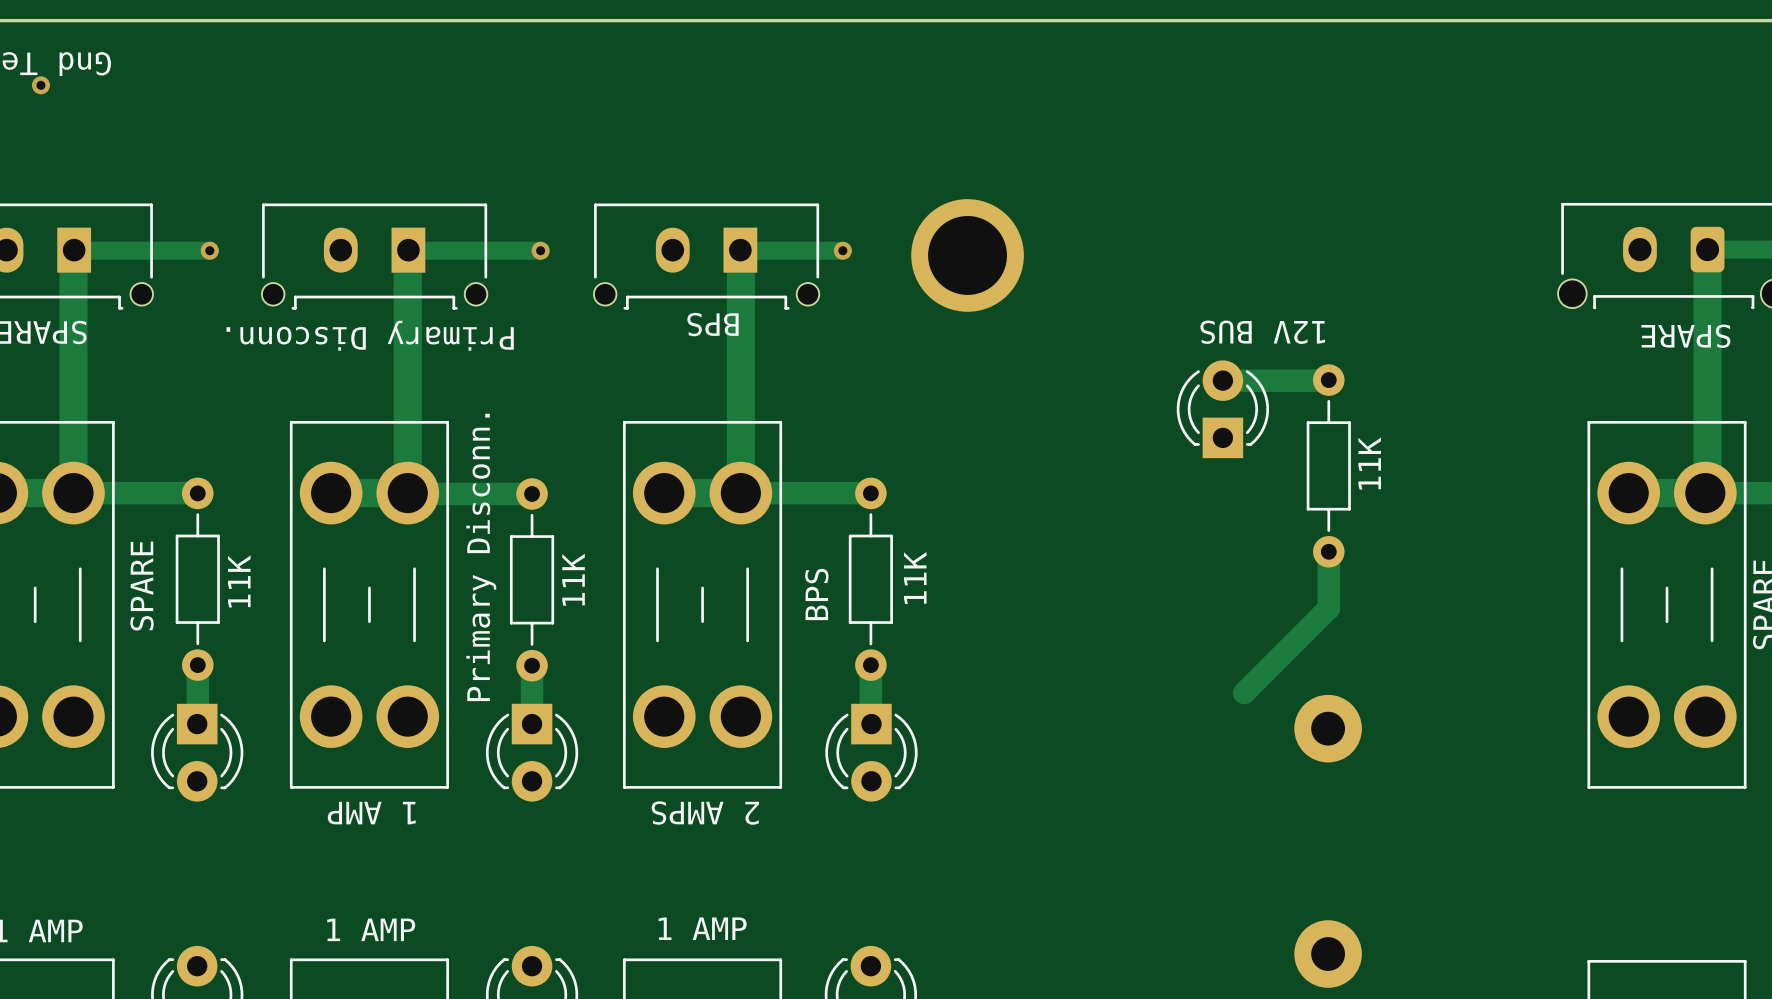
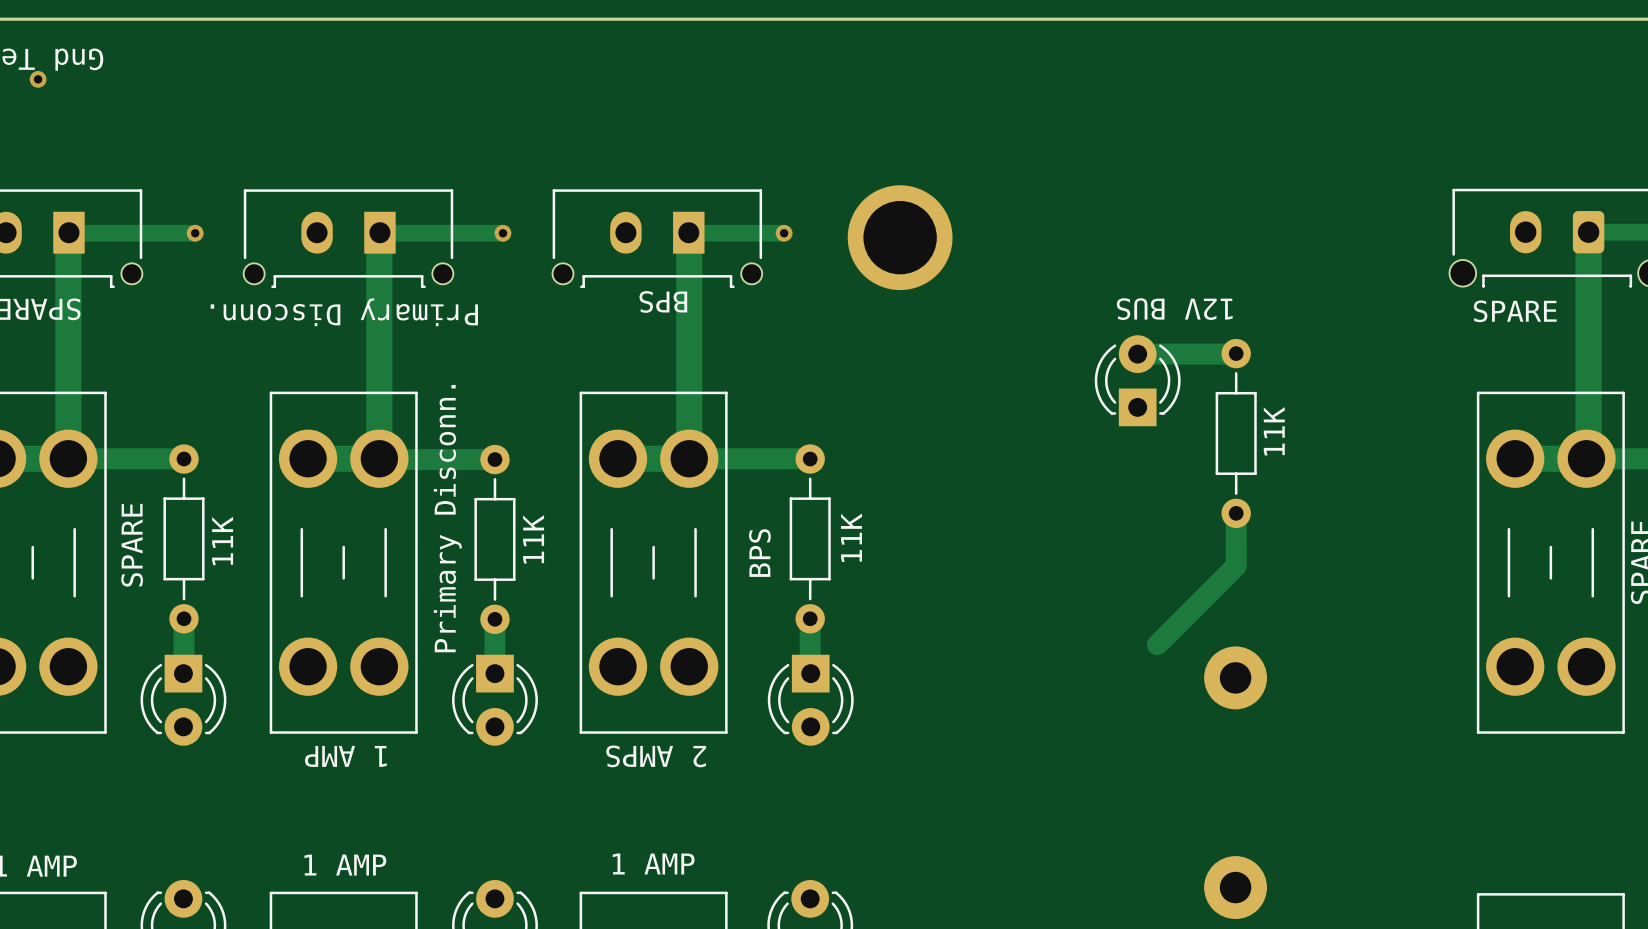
part value rotation: 0° (1685, 336) -> 180° (1515, 311)

